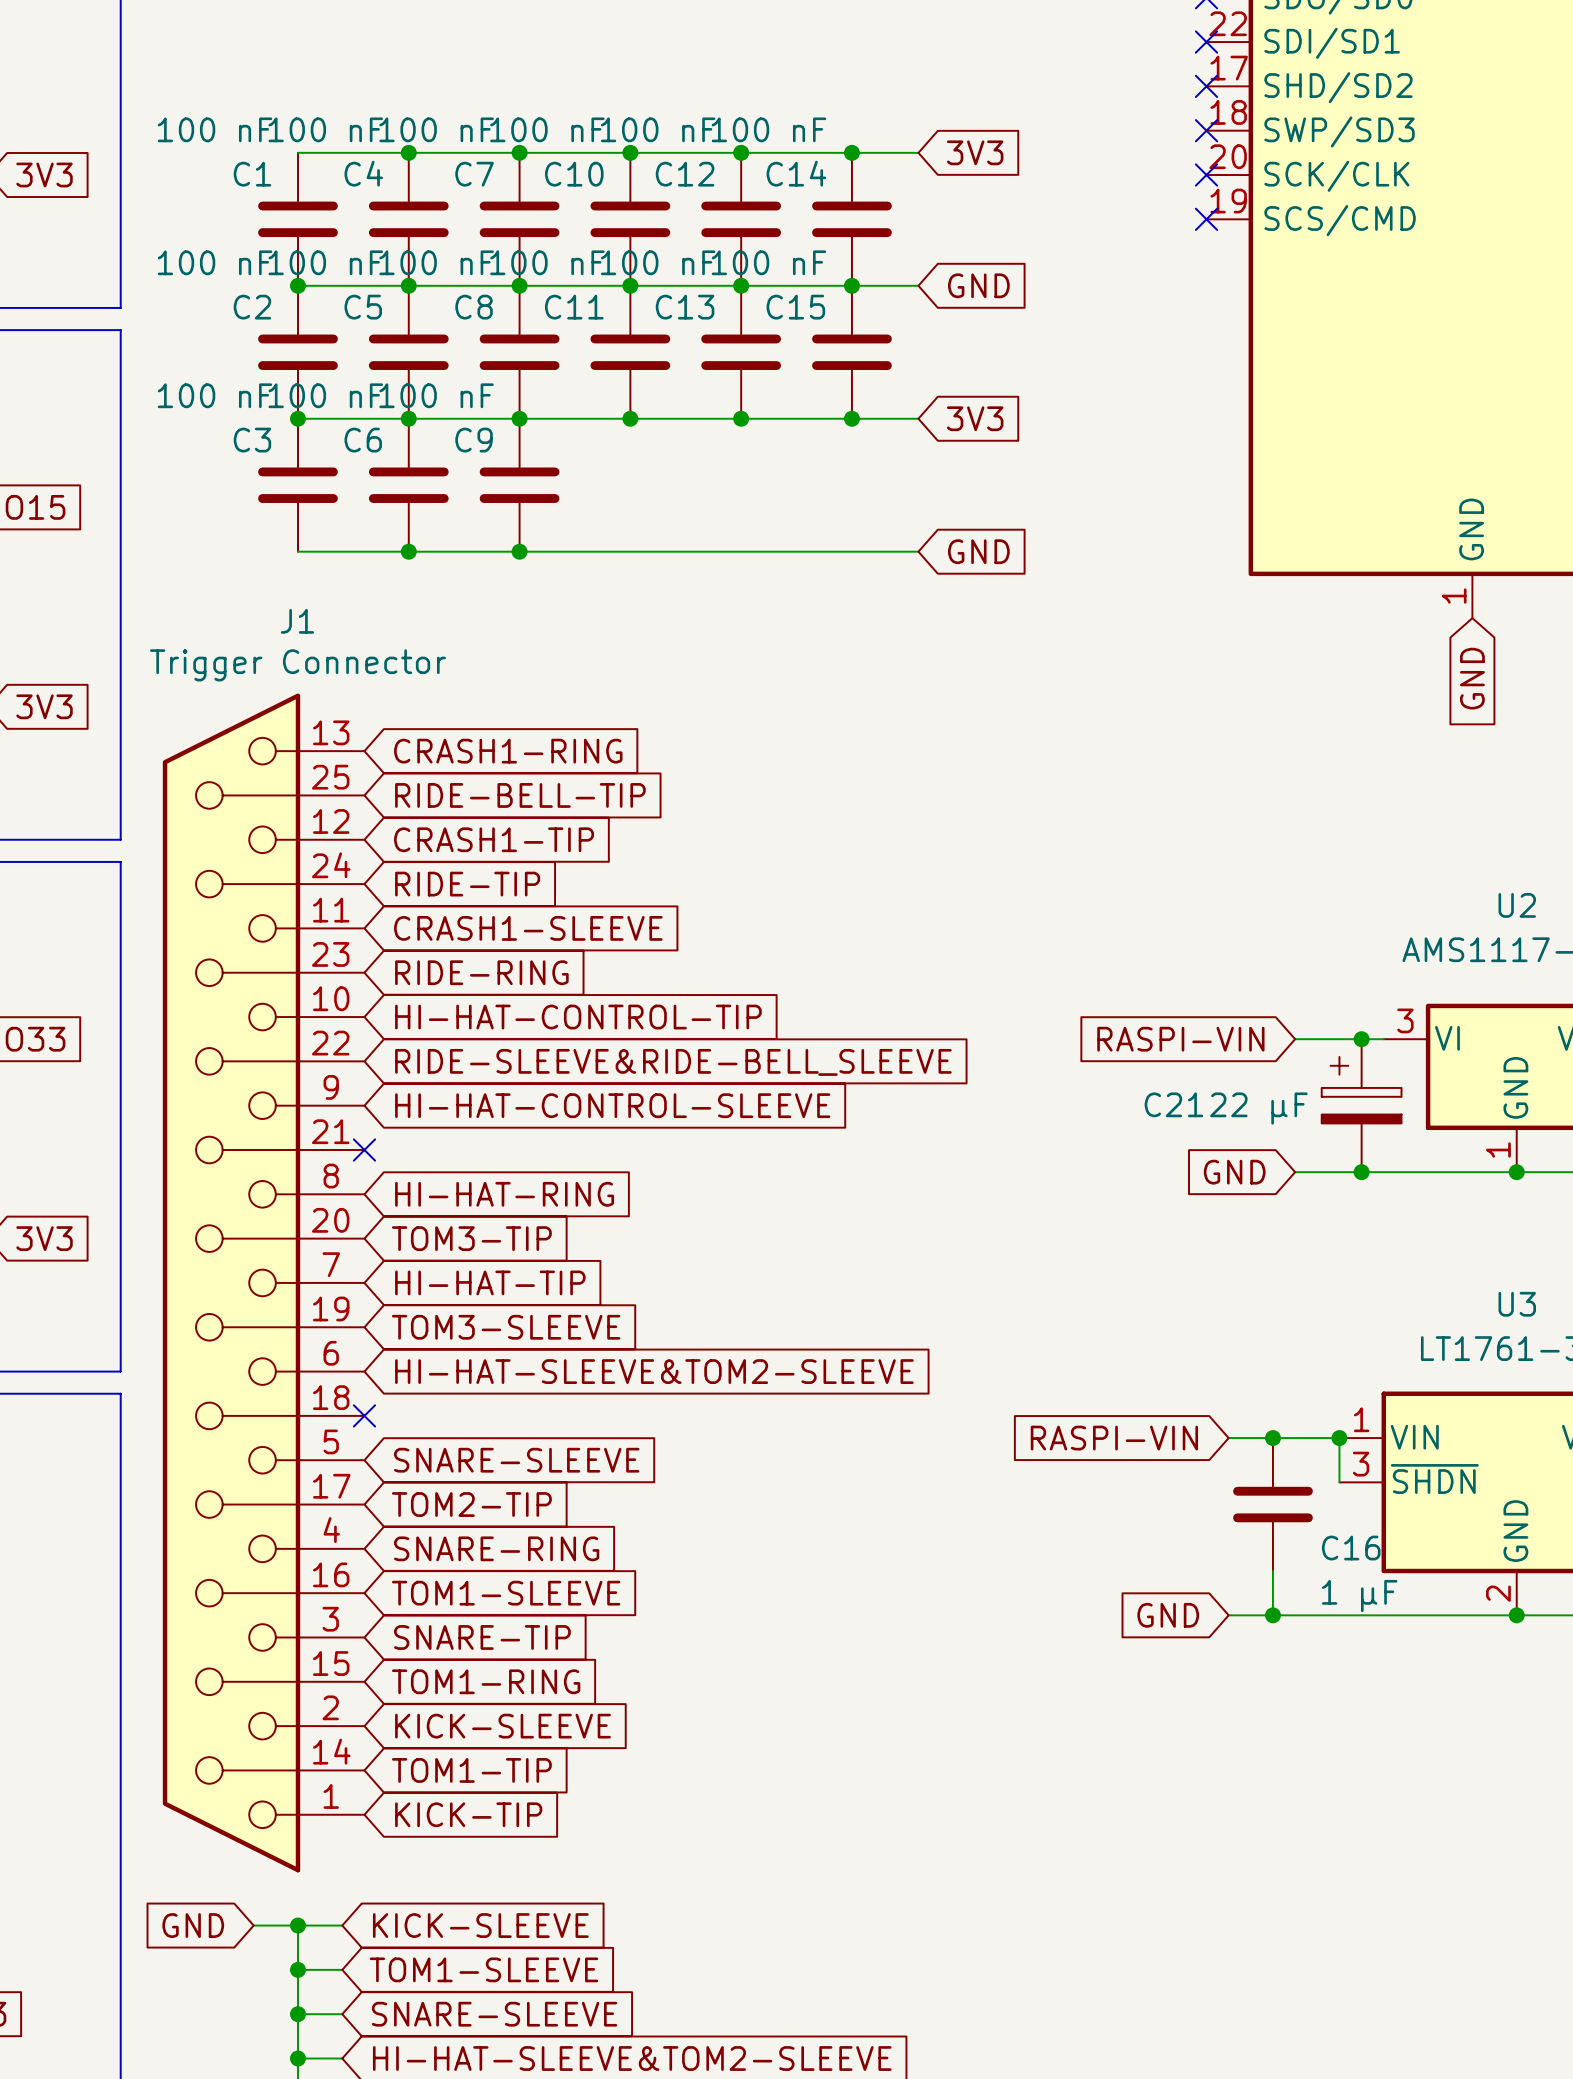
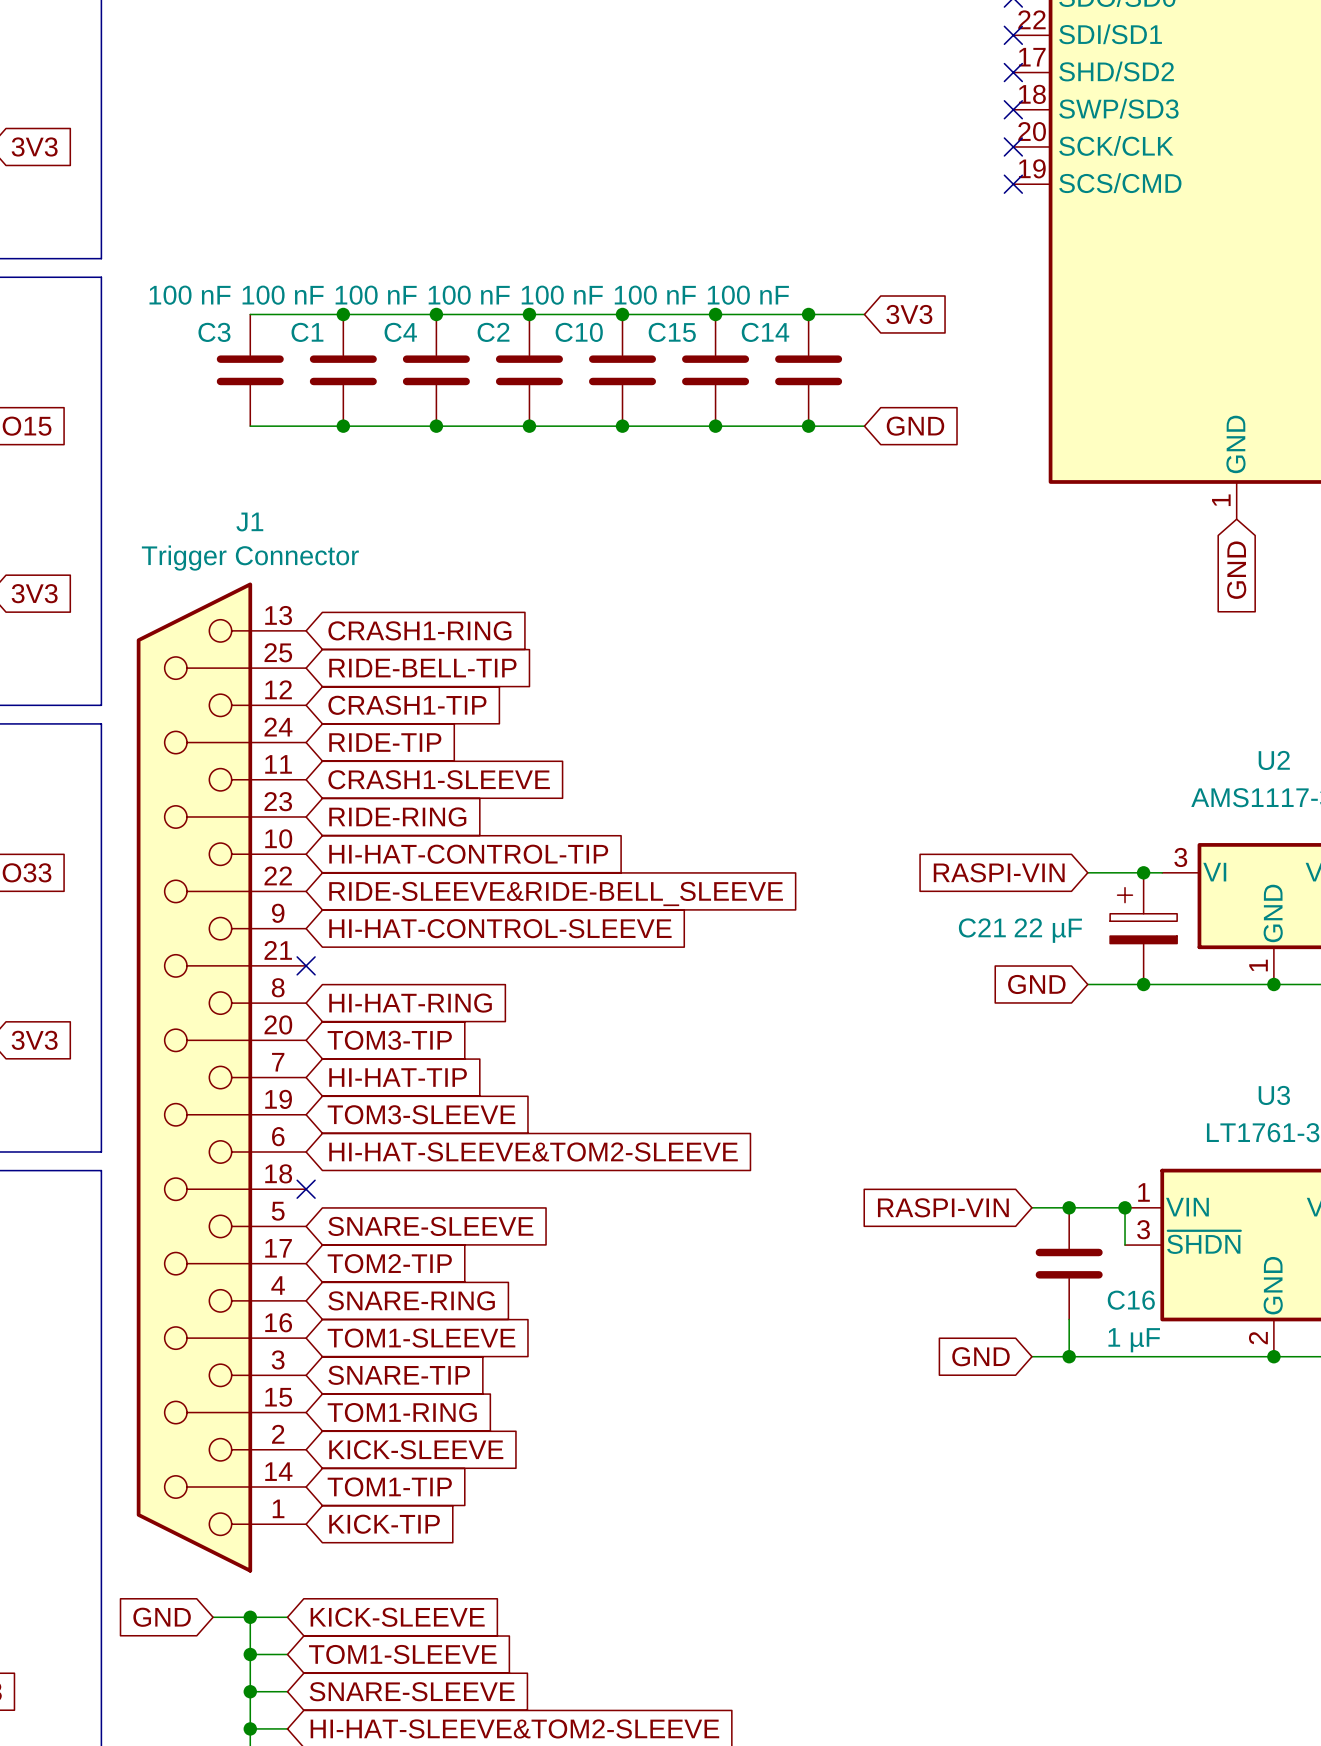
wire: (297, 152) (918, 152) -> none
junction: (408, 152) -> none
junction: (519, 152) -> none
junction: (630, 152) -> none
junction: (741, 152) -> none
junction: (851, 152) -> none
global label: 3V3 (975, 152) -> none
C1 position: (297, 219) -> (343, 370)
C4 position: (408, 219) -> (436, 370)
C7: 100 nF (519, 219) -> none
C10 position: (630, 219) -> (622, 370)
C12: 100 nF (741, 219) -> none
C14 position: (851, 219) -> (808, 370)
wire: (297, 285) (918, 285) -> none
junction: (297, 285) -> none
junction: (408, 285) -> none
junction: (519, 285) -> none
junction: (630, 285) -> none
junction: (741, 285) -> none
junction: (851, 285) -> none
global label: GND (978, 285) -> none
C2 position: (297, 352) -> (529, 370)
C5: 100 nF (408, 352) -> none
C8: 100 nF (519, 352) -> none
C11: 100 nF (630, 352) -> none
C13: 100 nF (741, 352) -> none
C15 position: (851, 352) -> (715, 370)
wire: none -> (250, 314) (864, 314)
junction: none -> (343, 314)
junction: none -> (436, 314)
junction: none -> (529, 314)
junction: none -> (622, 314)
junction: none -> (715, 314)
junction: none -> (808, 314)
wire: (297, 418) (918, 418) -> none
junction: (297, 418) -> none
junction: (408, 418) -> none
junction: (519, 418) -> none
junction: (630, 418) -> none
junction: (741, 418) -> none
junction: (851, 418) -> none
global label position: 3V3 (975, 418) -> 3V3 (909, 314)
C3 position: (297, 485) -> (250, 370)
C6: 100 nF (408, 485) -> none
C9: 100 nF (519, 485) -> none
wire: none -> (250, 426) (864, 426)
junction: none -> (343, 426)
junction: none -> (436, 426)
junction: none -> (529, 426)
junction: none -> (622, 426)
junction: none -> (715, 426)
junction: none -> (808, 426)
wire: (297, 551) (918, 551) -> none
junction: (408, 551) -> none
junction: (519, 551) -> none
global label position: GND (978, 551) -> GND (915, 426)

